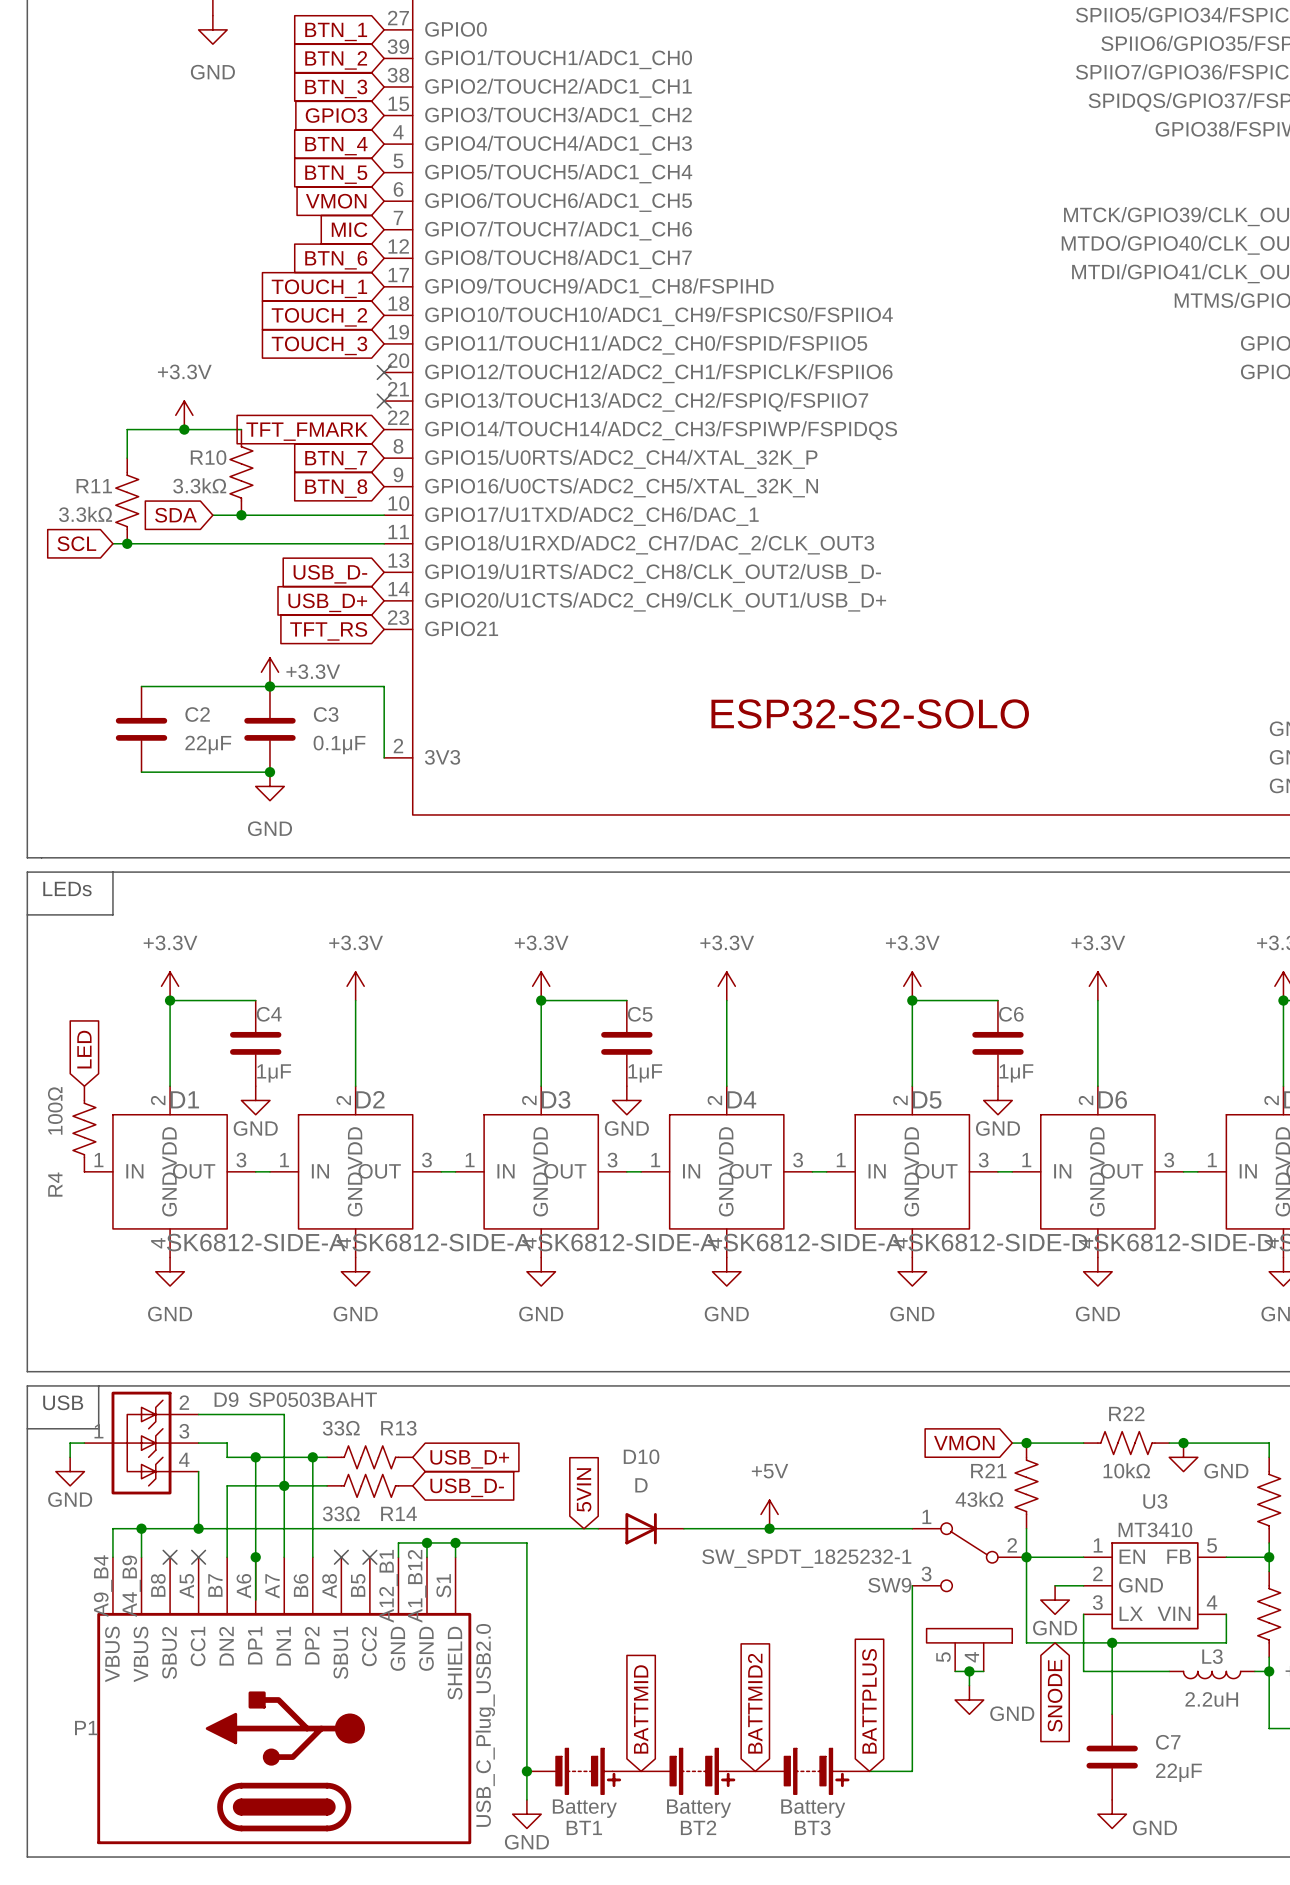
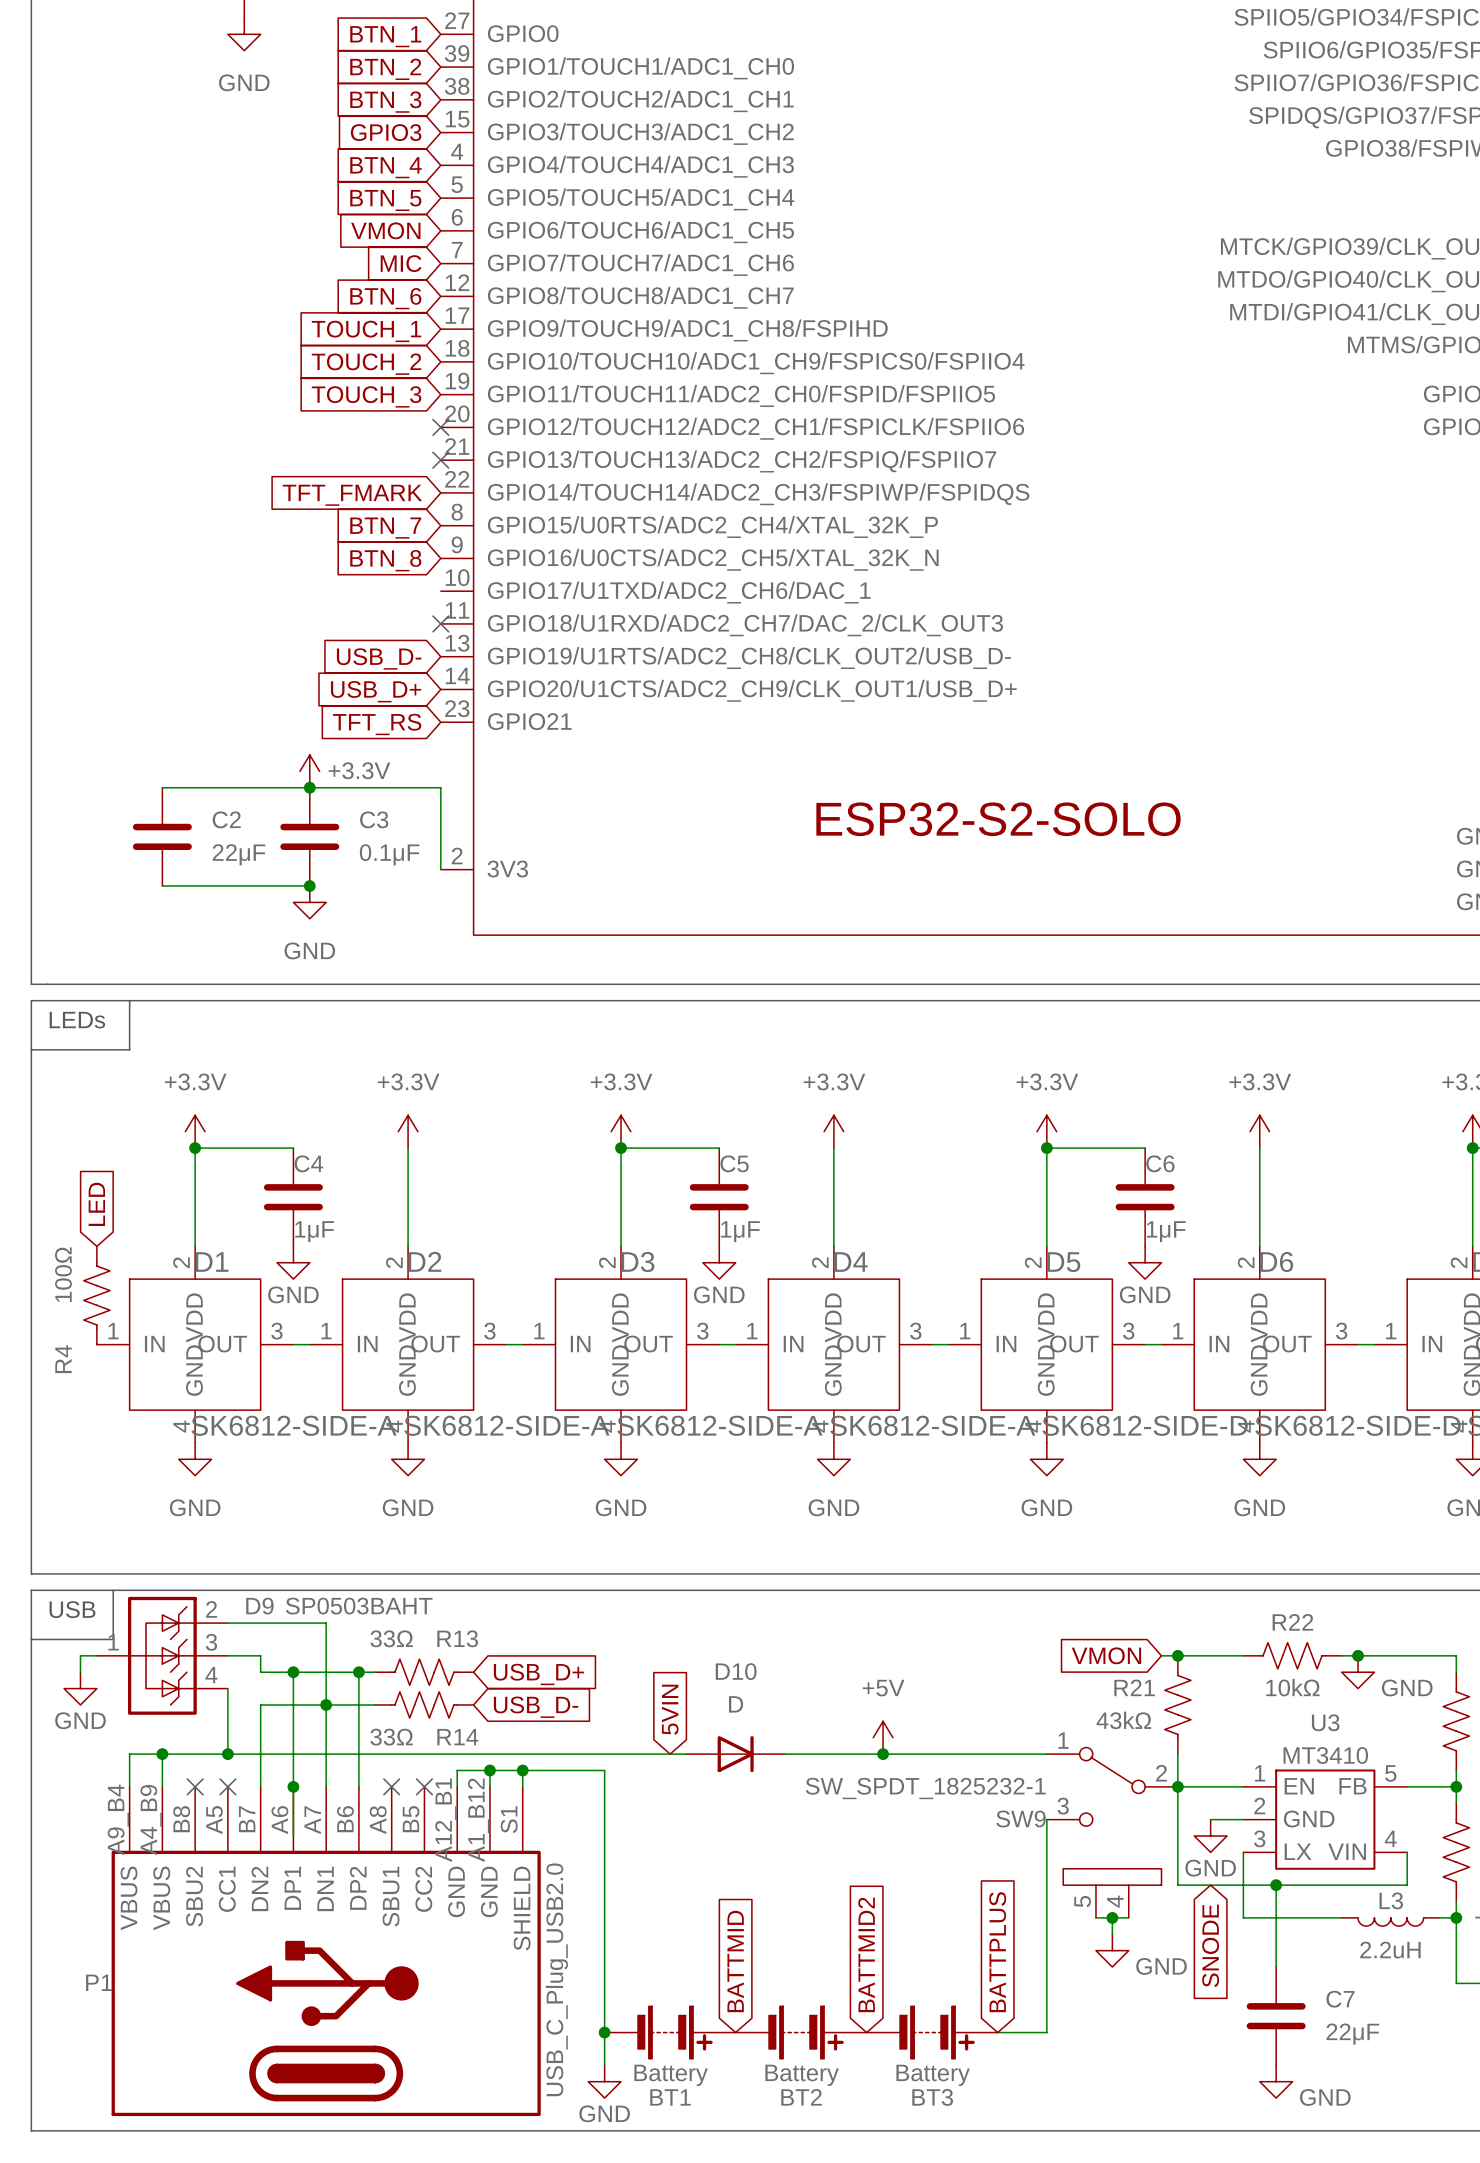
power symbol: +3.3V (184, 415) -> none
junction: (184, 429) -> none
wire: (241, 429) (127, 429) (127, 458) -> none
R10: 3.3kΩ (241, 472) -> none
R11: 3.3kΩ (127, 500) -> none
global label: SDA (175, 515) -> none
wire: (212, 515) (384, 515) -> none
junction: (241, 515) -> none
global label: SCL (76, 543) -> none
wire: (112, 543) (384, 543) -> none
junction: (127, 543) -> none
no-connect mark: none -> (440, 623)

